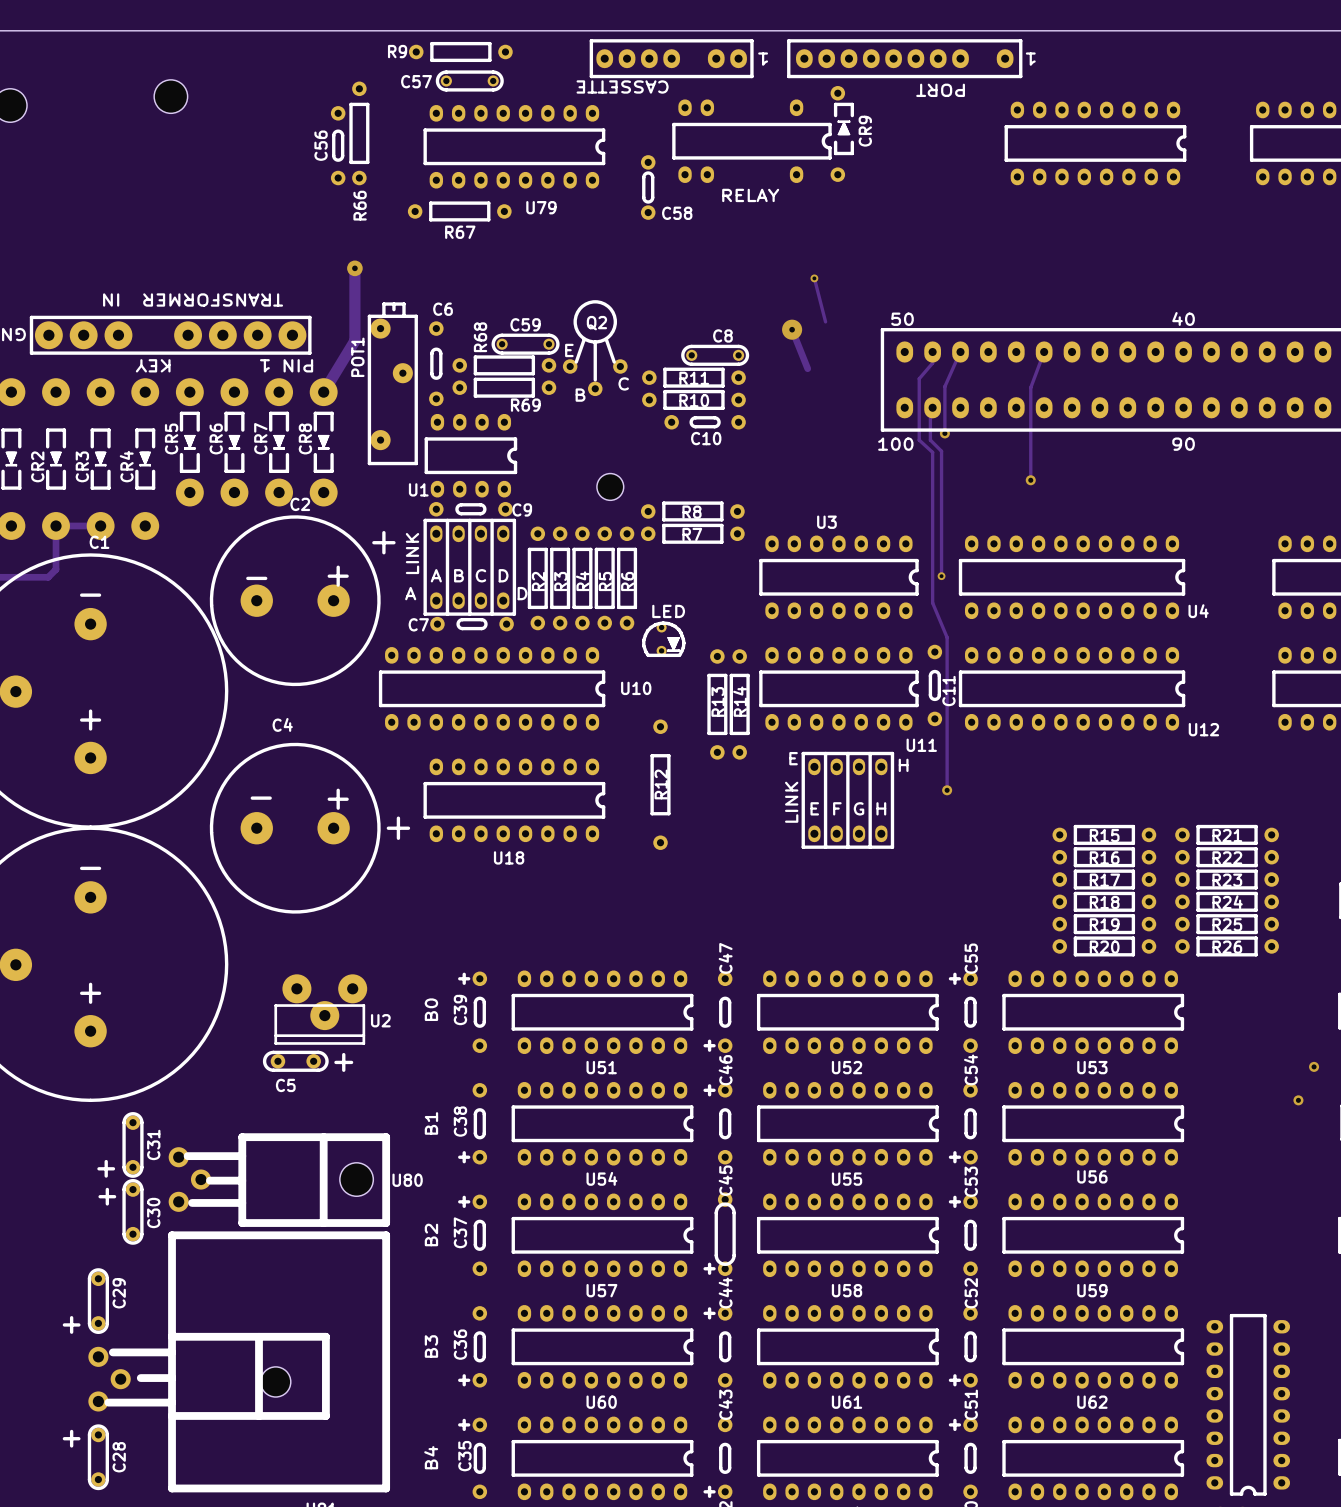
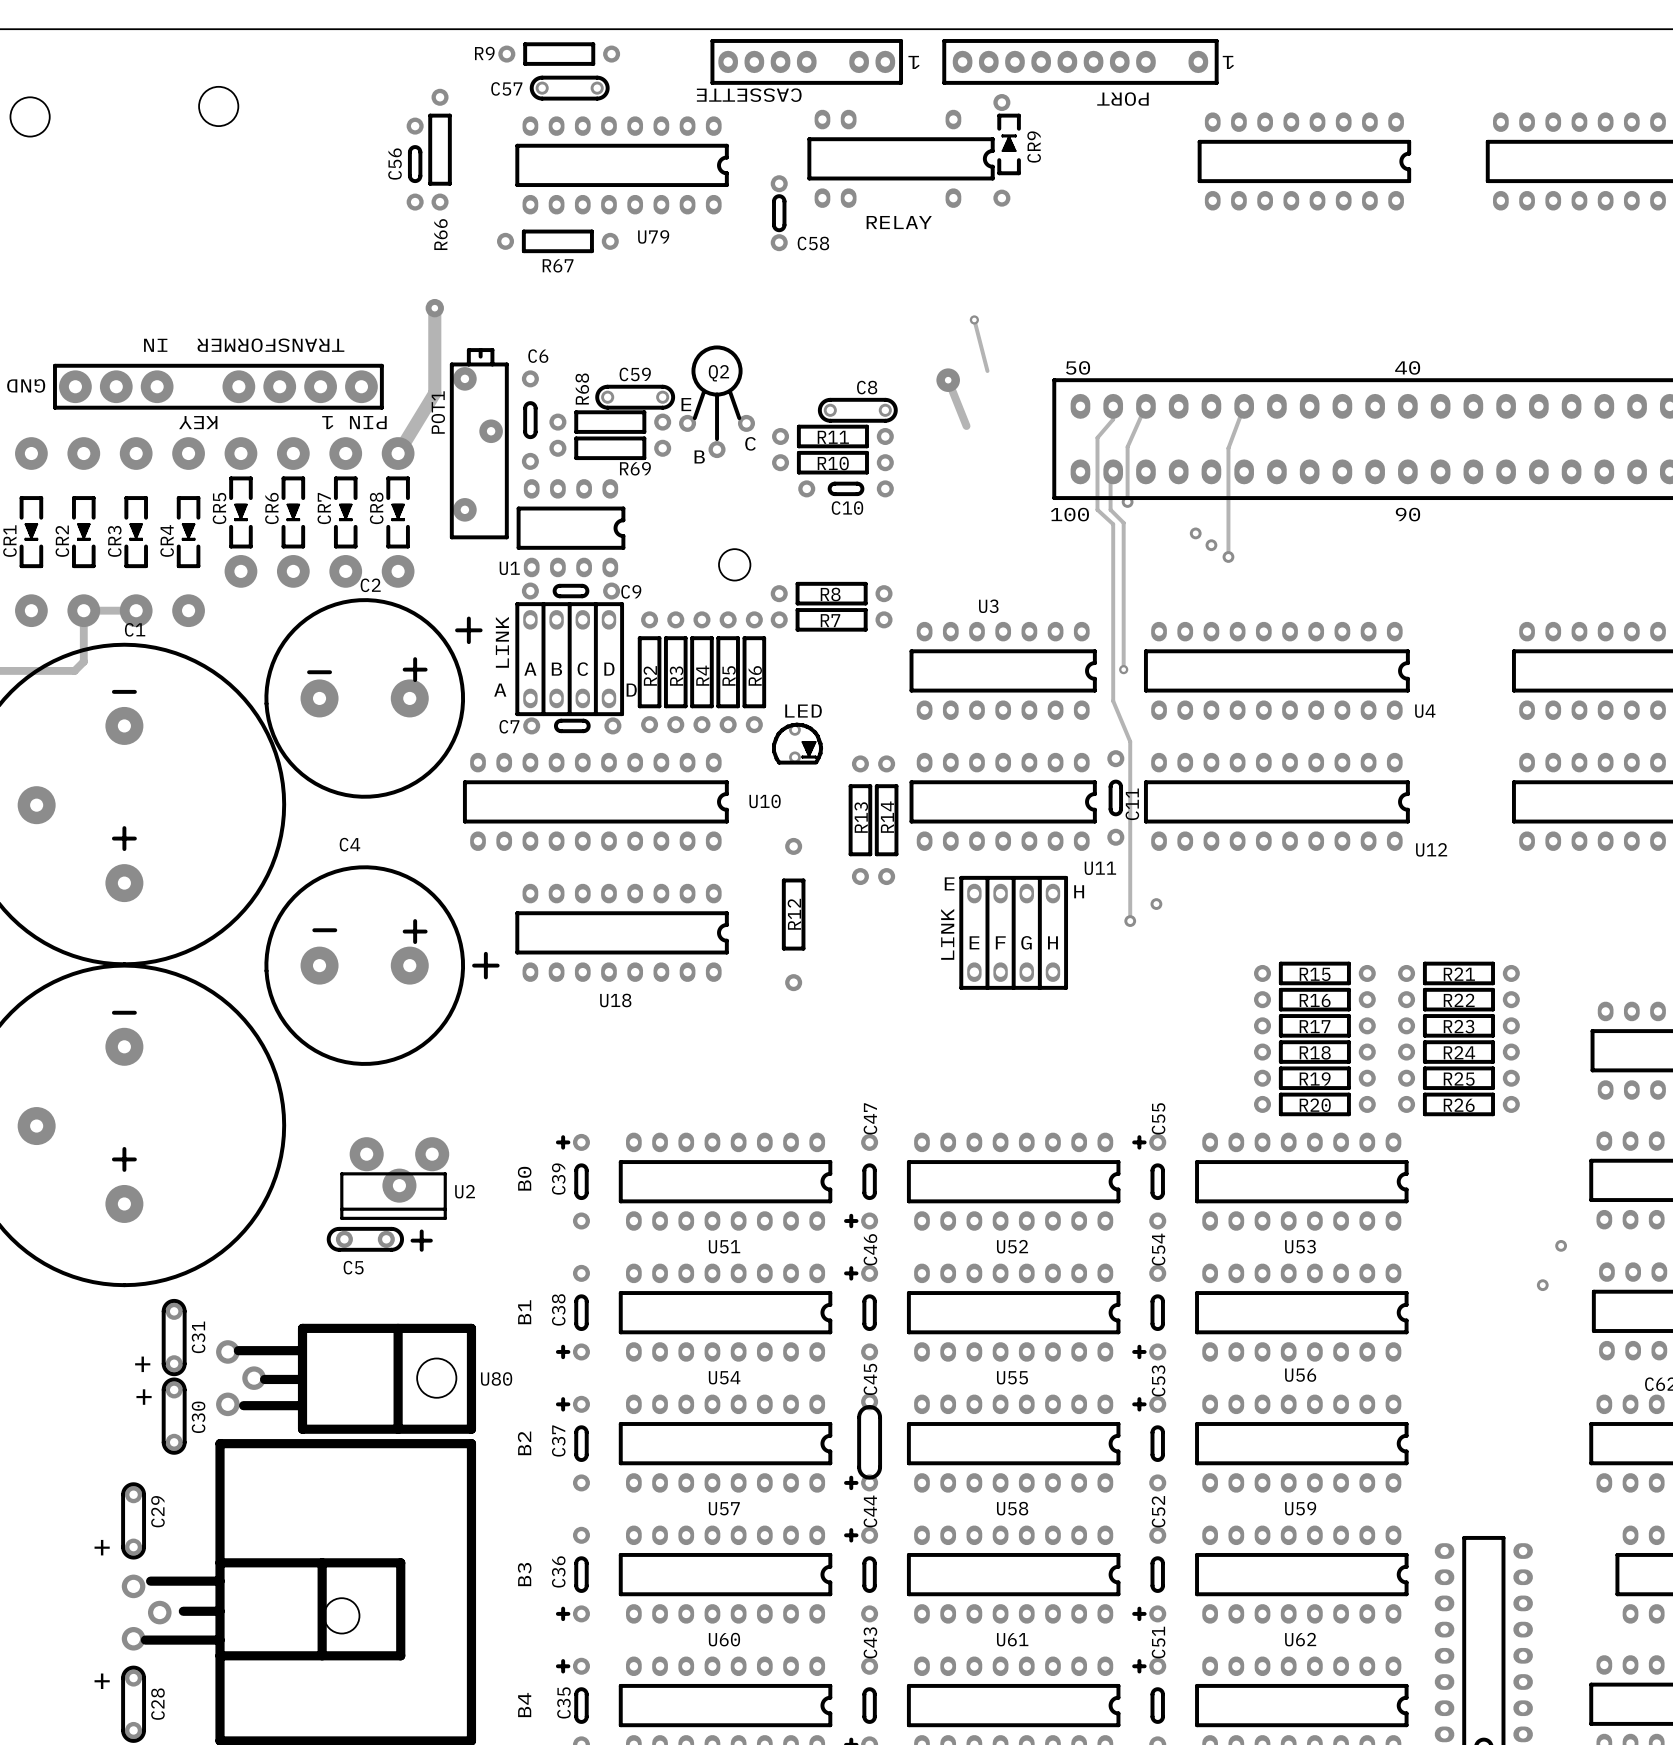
via: none -> (1195, 533)
via: none -> (1211, 545)
via: none -> (1156, 904)

